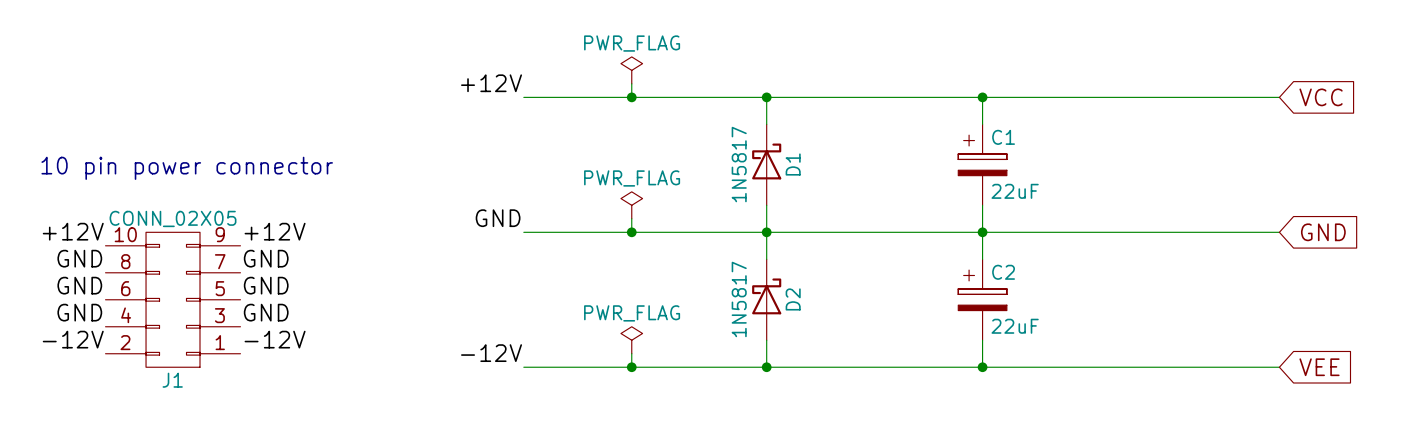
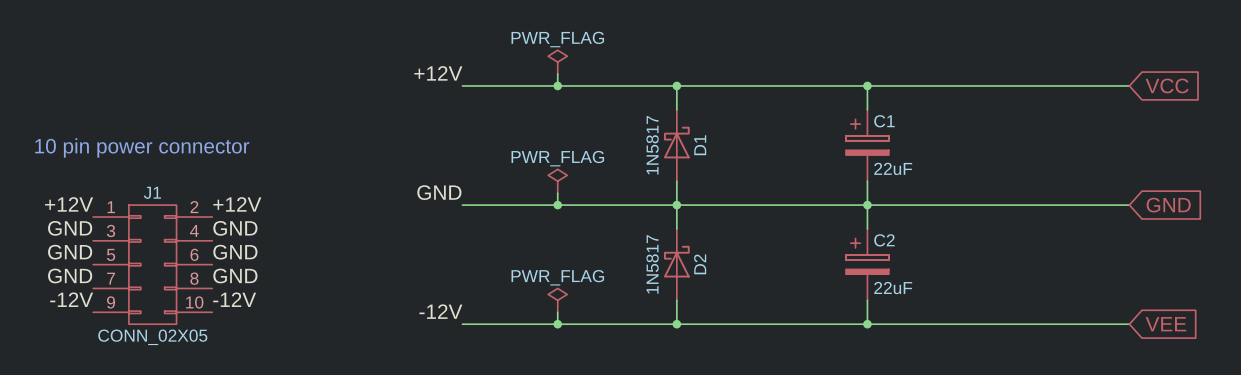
J1 rotation: 0° (173, 299) -> 180° (152, 264)

